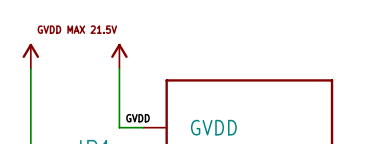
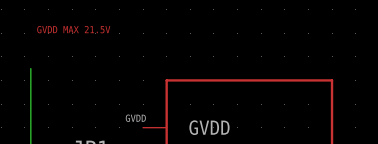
power symbol: (30, 56) -> none
power symbol: (119, 56) -> none
wire: (119, 68) (119, 127) (143, 127) -> none

